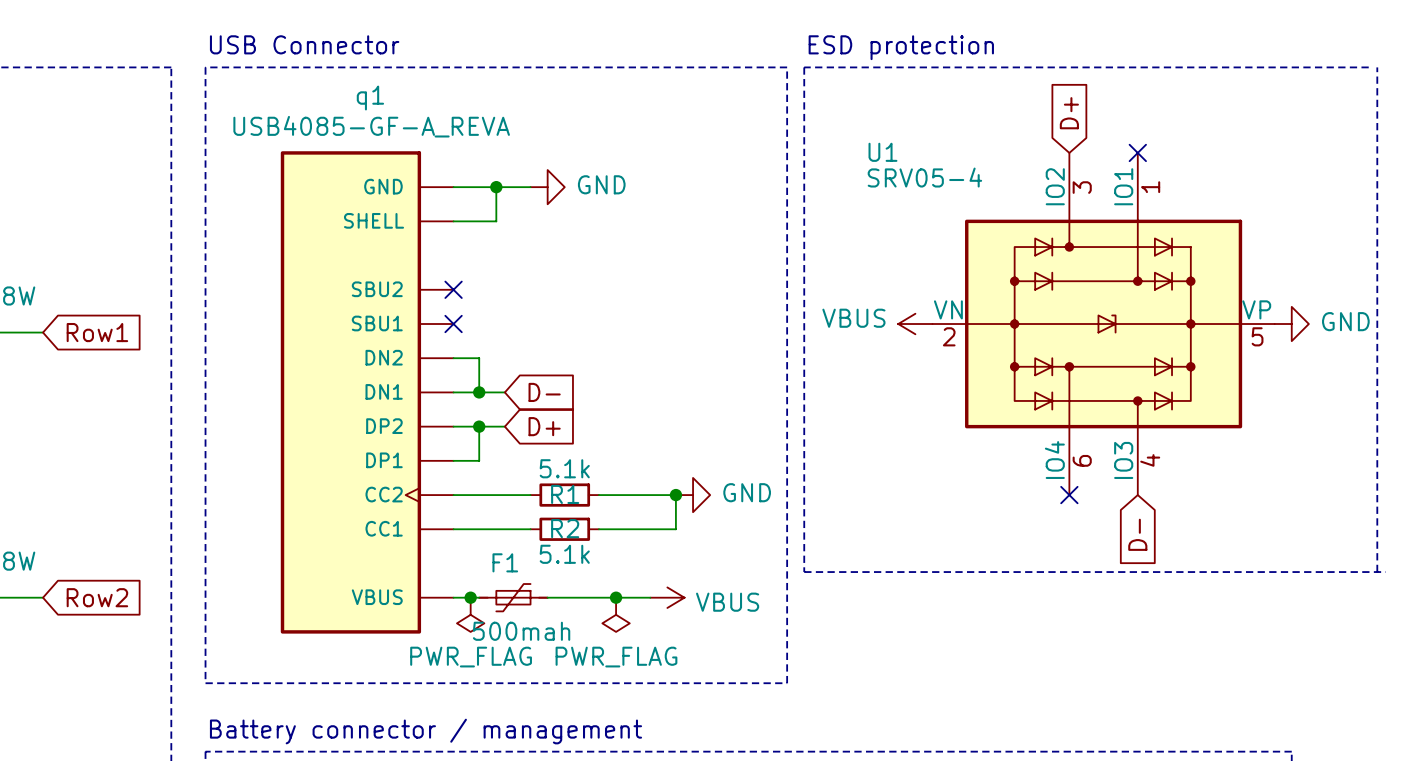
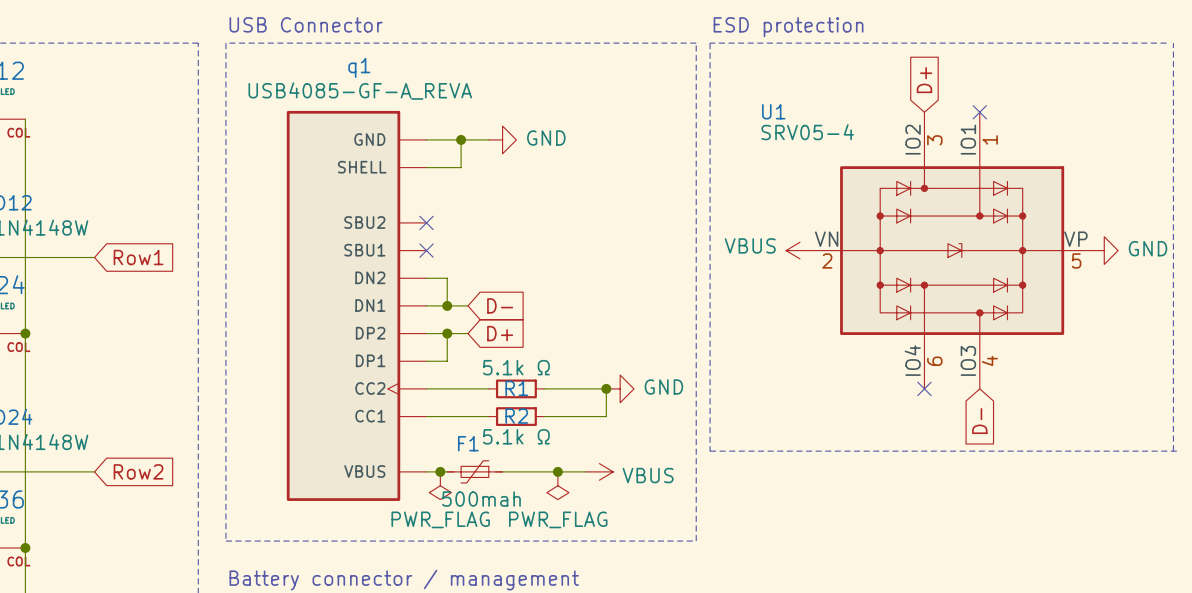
R1 value: 5.1k (564, 468) -> 5.1k Ω (516, 367)
R2 value: 5.1k (564, 554) -> 5.1k Ω (516, 436)

